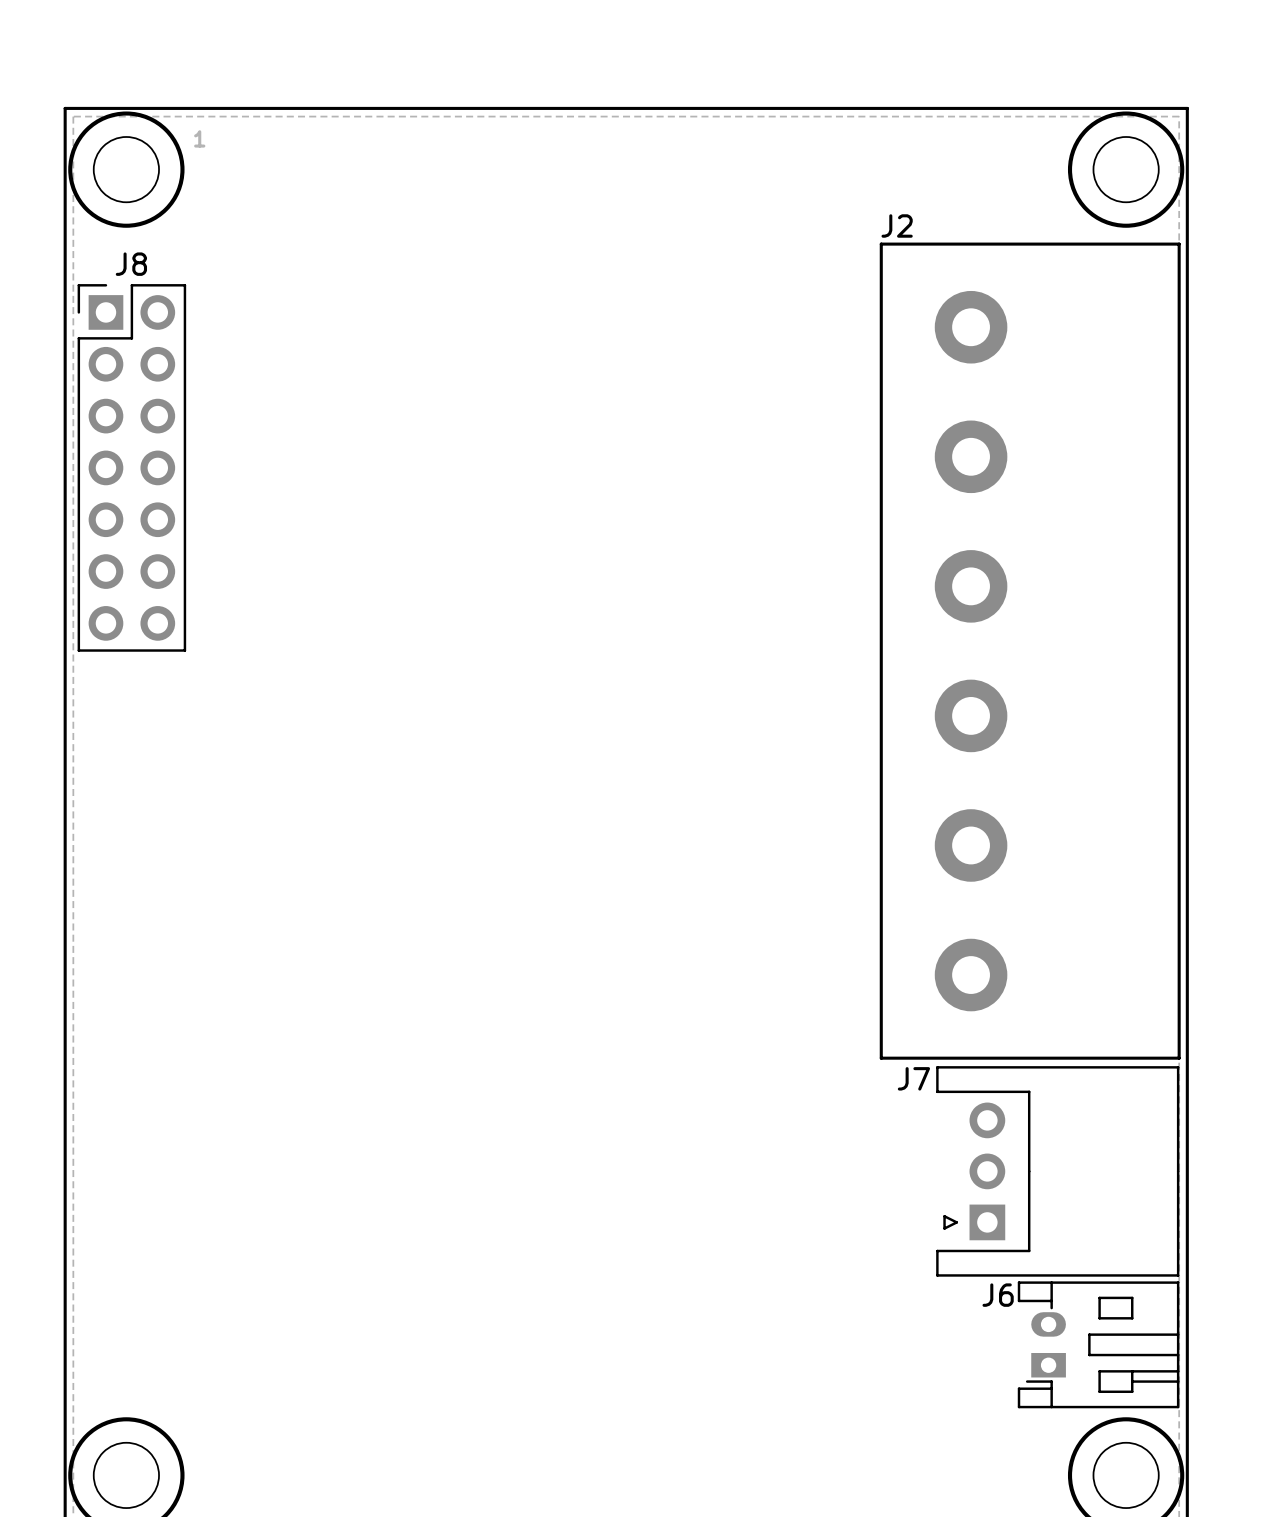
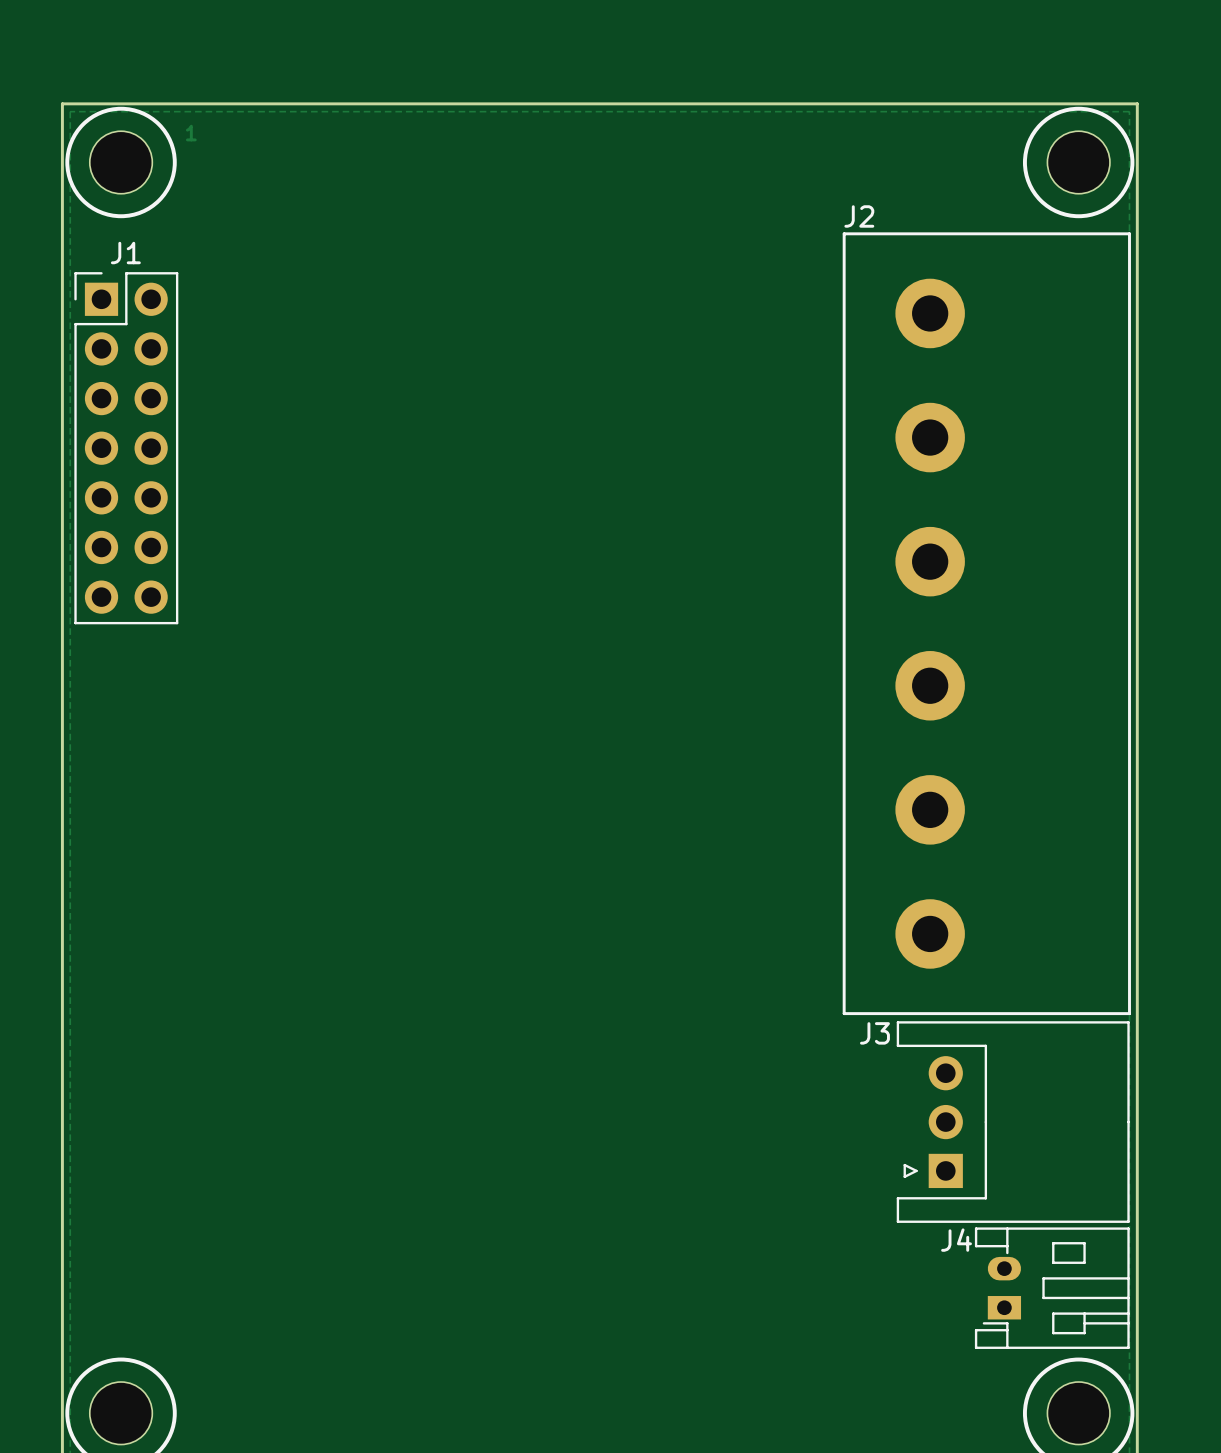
J8 name: J8 (131, 264) -> J1 (125, 253)
J7 name: J7 (913, 1078) -> J3 (874, 1033)
J6 name: J6 (998, 1295) -> J4 (956, 1240)

